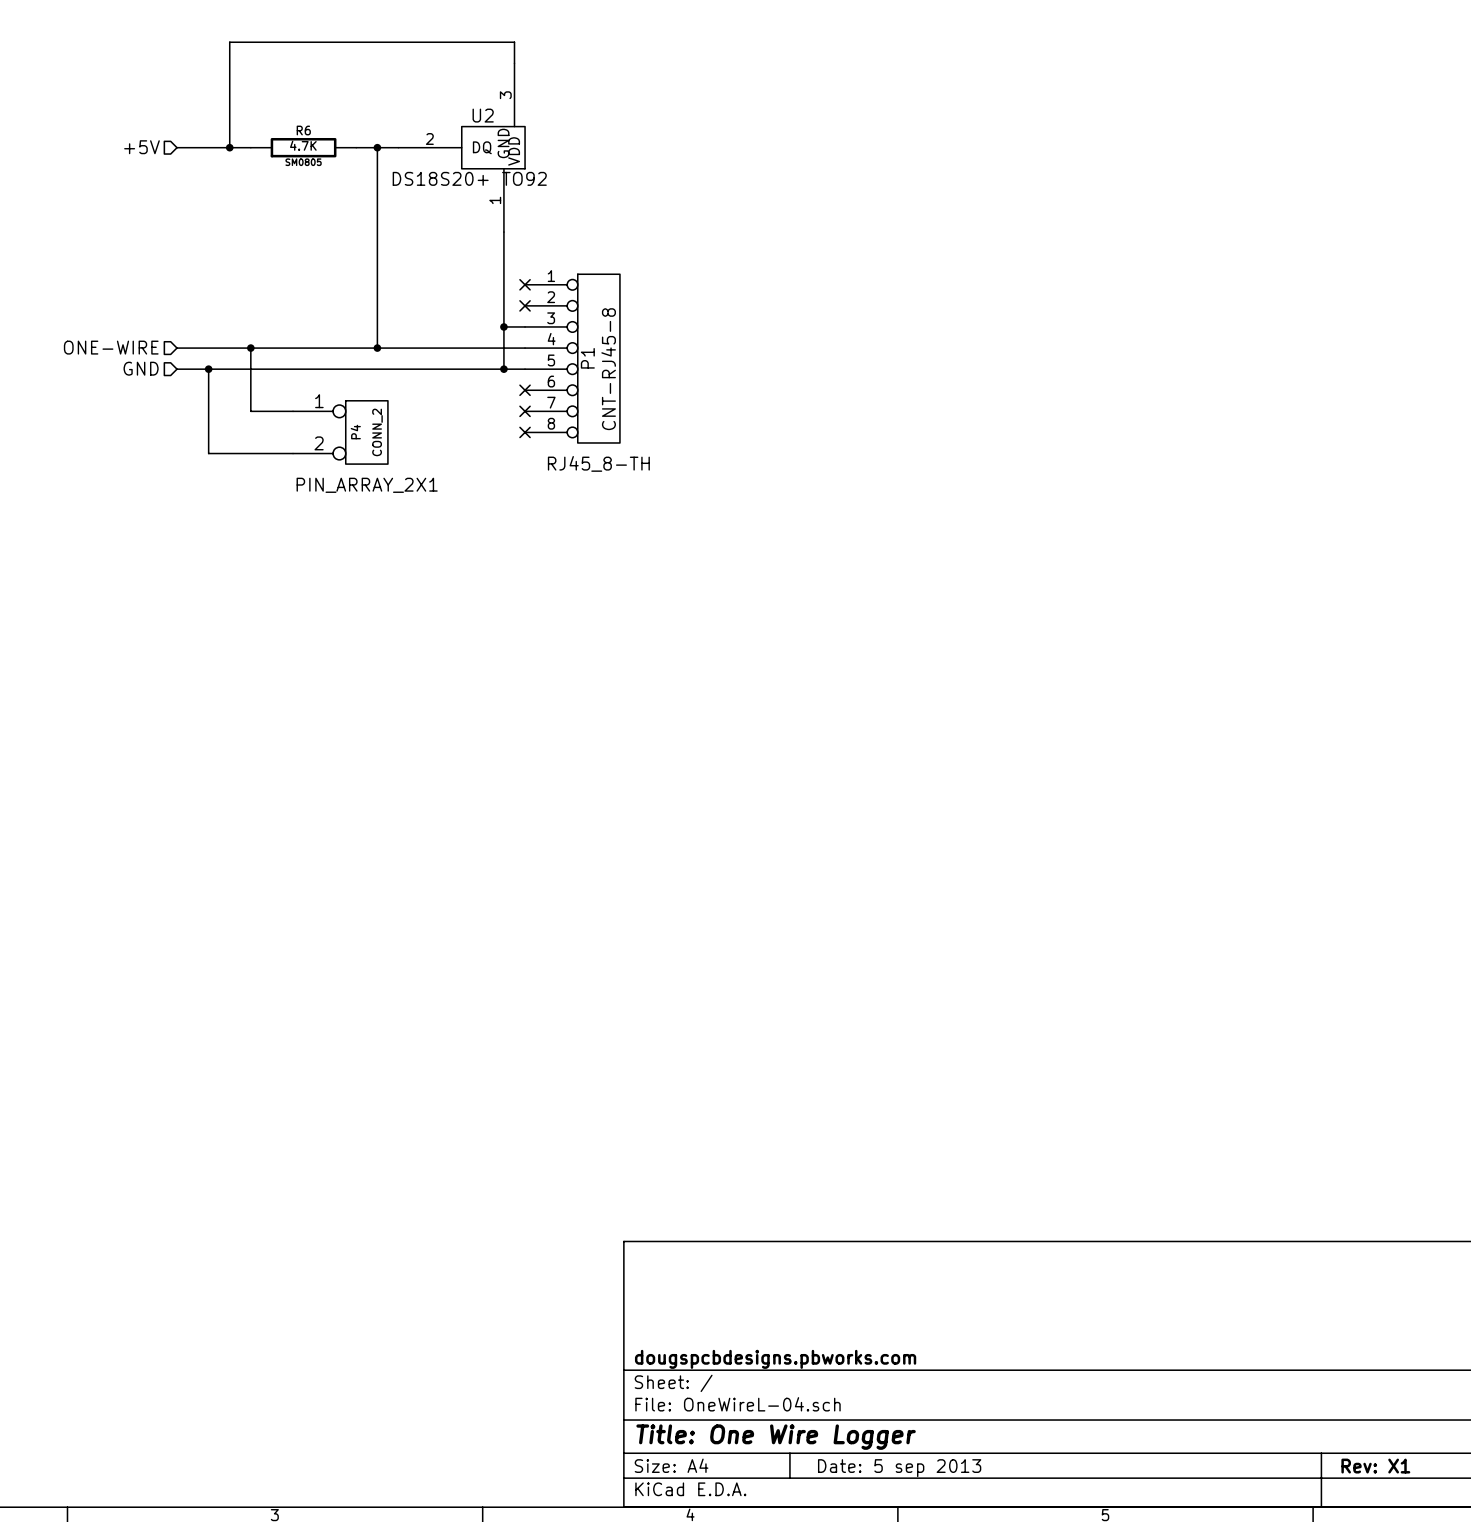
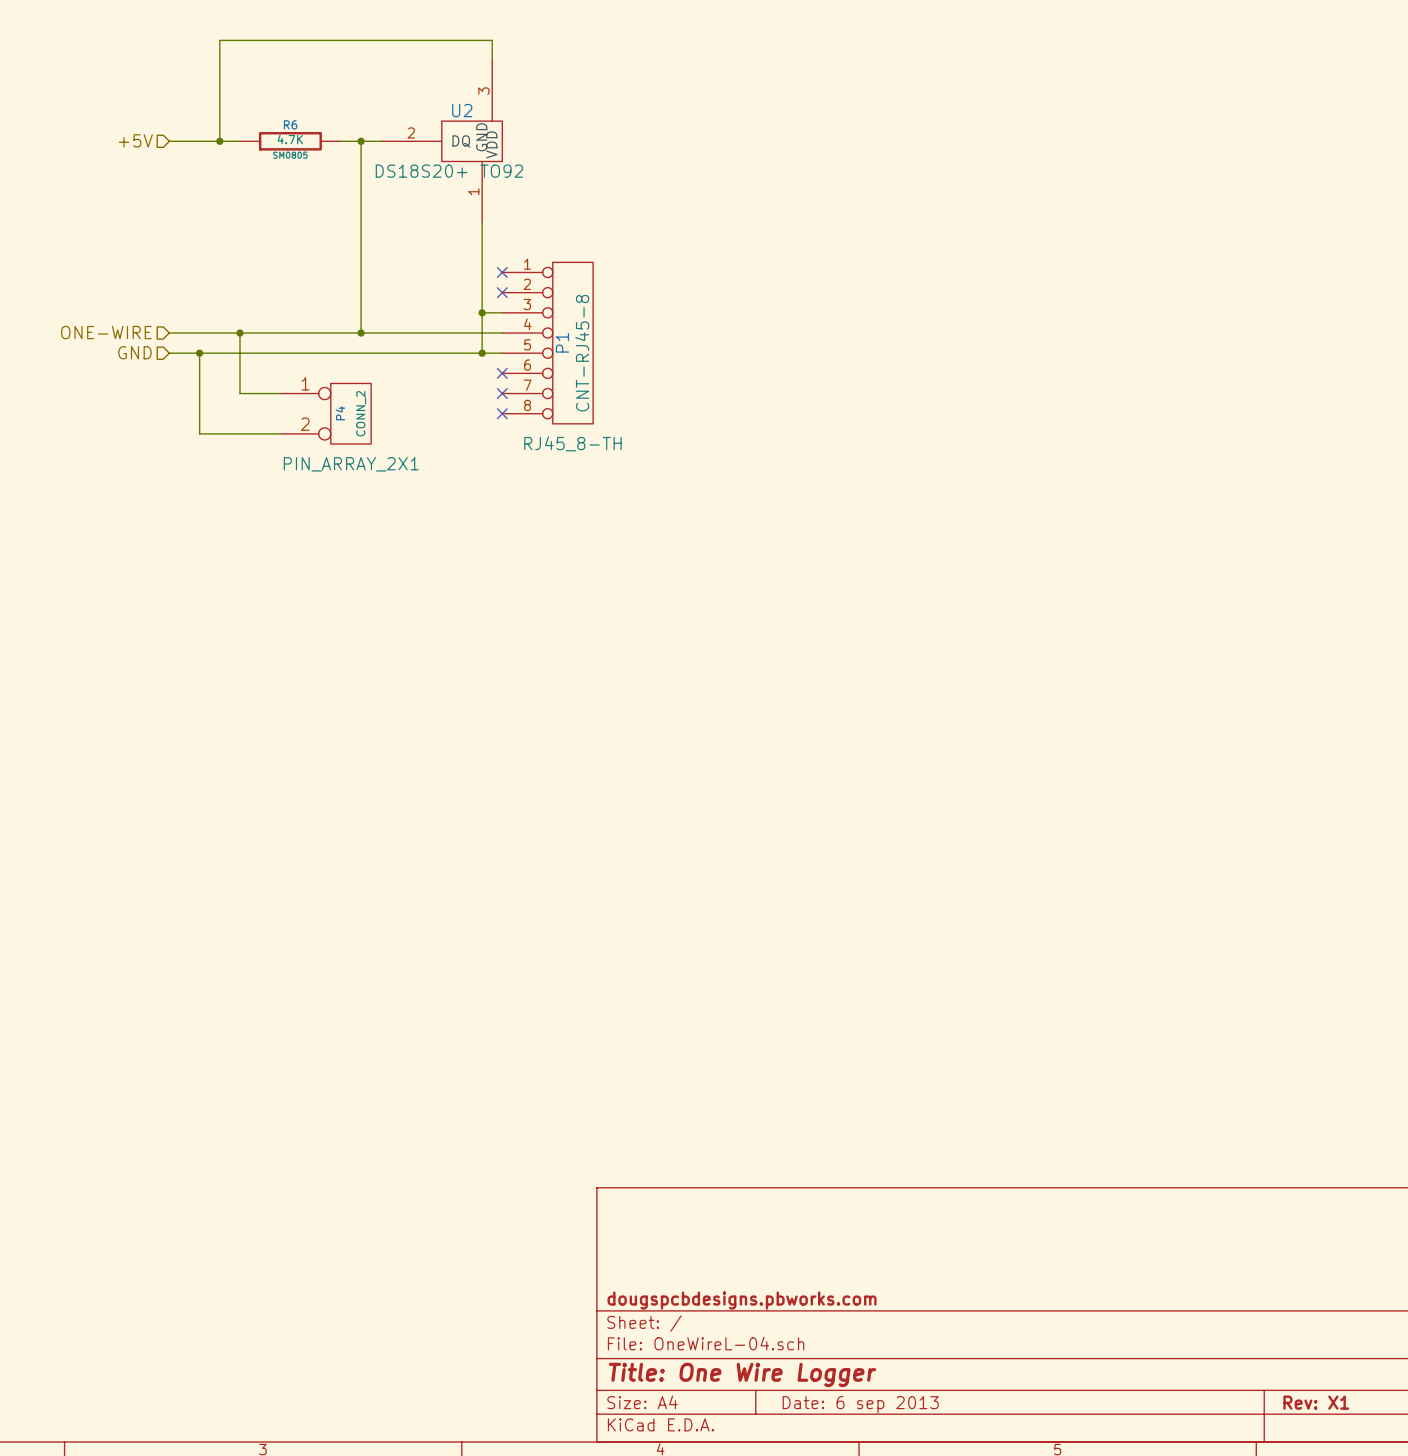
title block: Date: 5 sep 2013 (899, 1468) -> Date: 6 sep 2013 (860, 1404)

